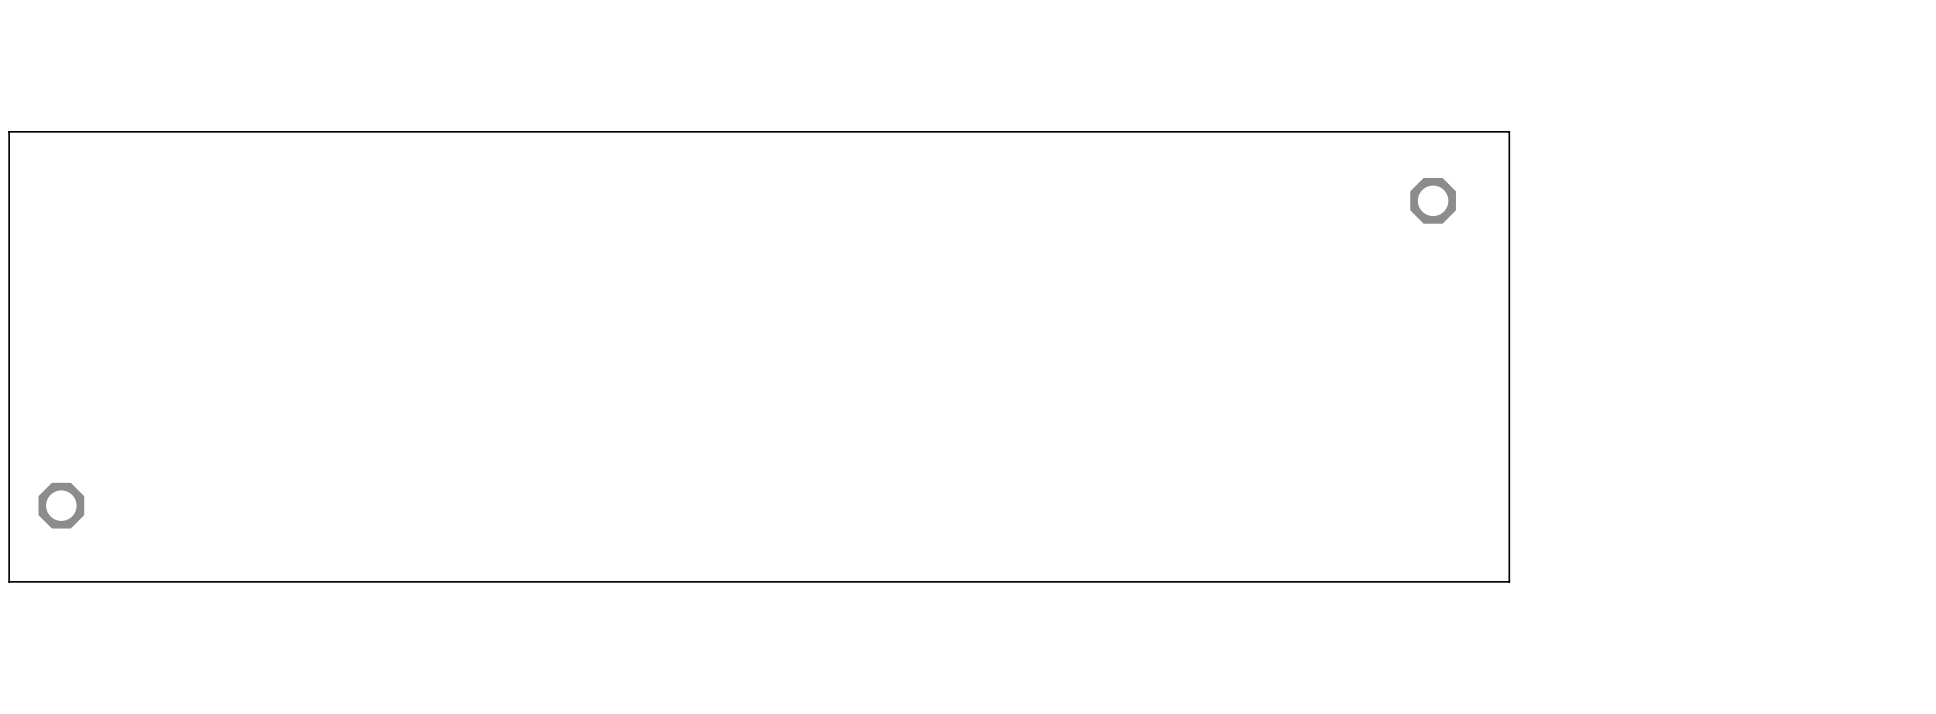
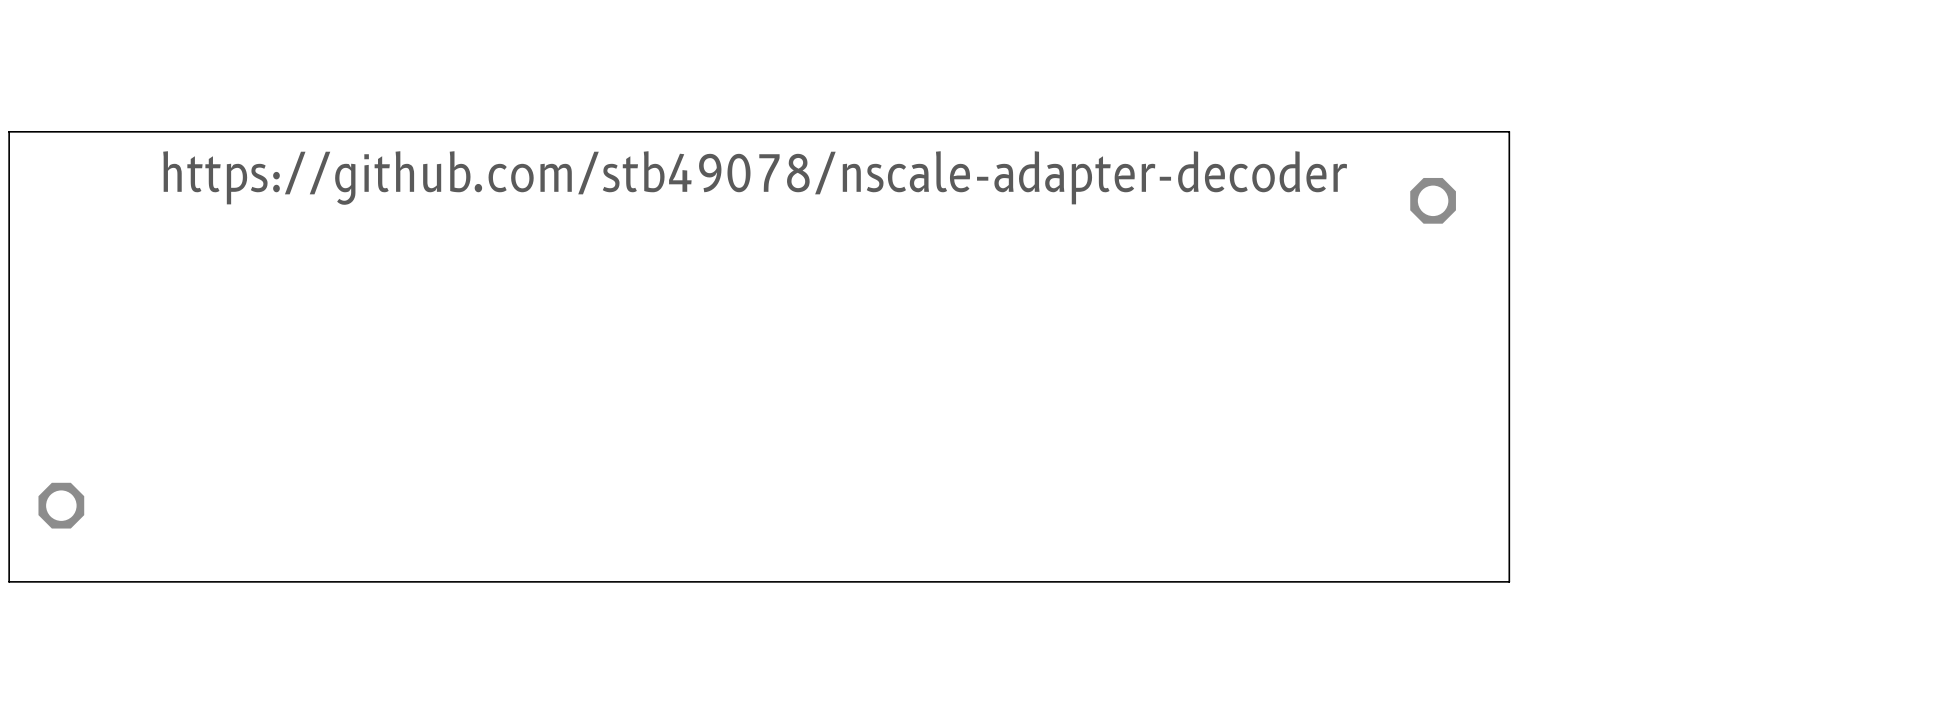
text: none -> https://github.com/stb49078/nscale-adapter-decoder (755, 178)

